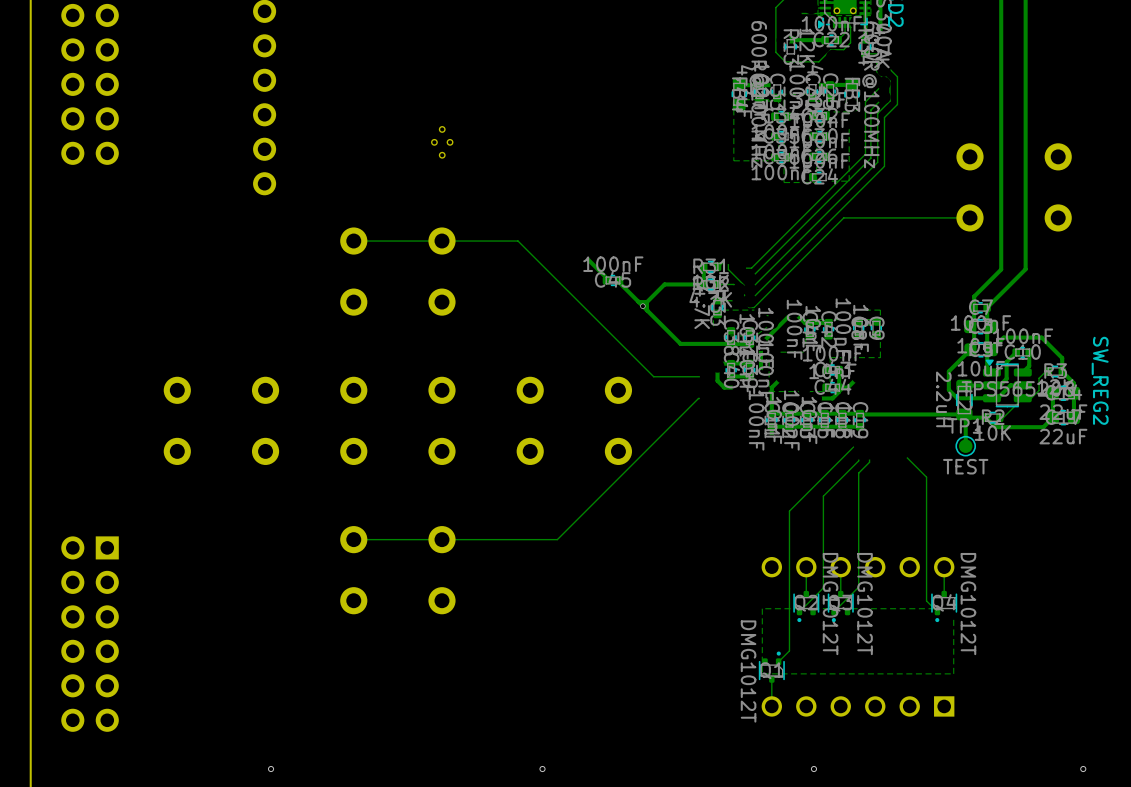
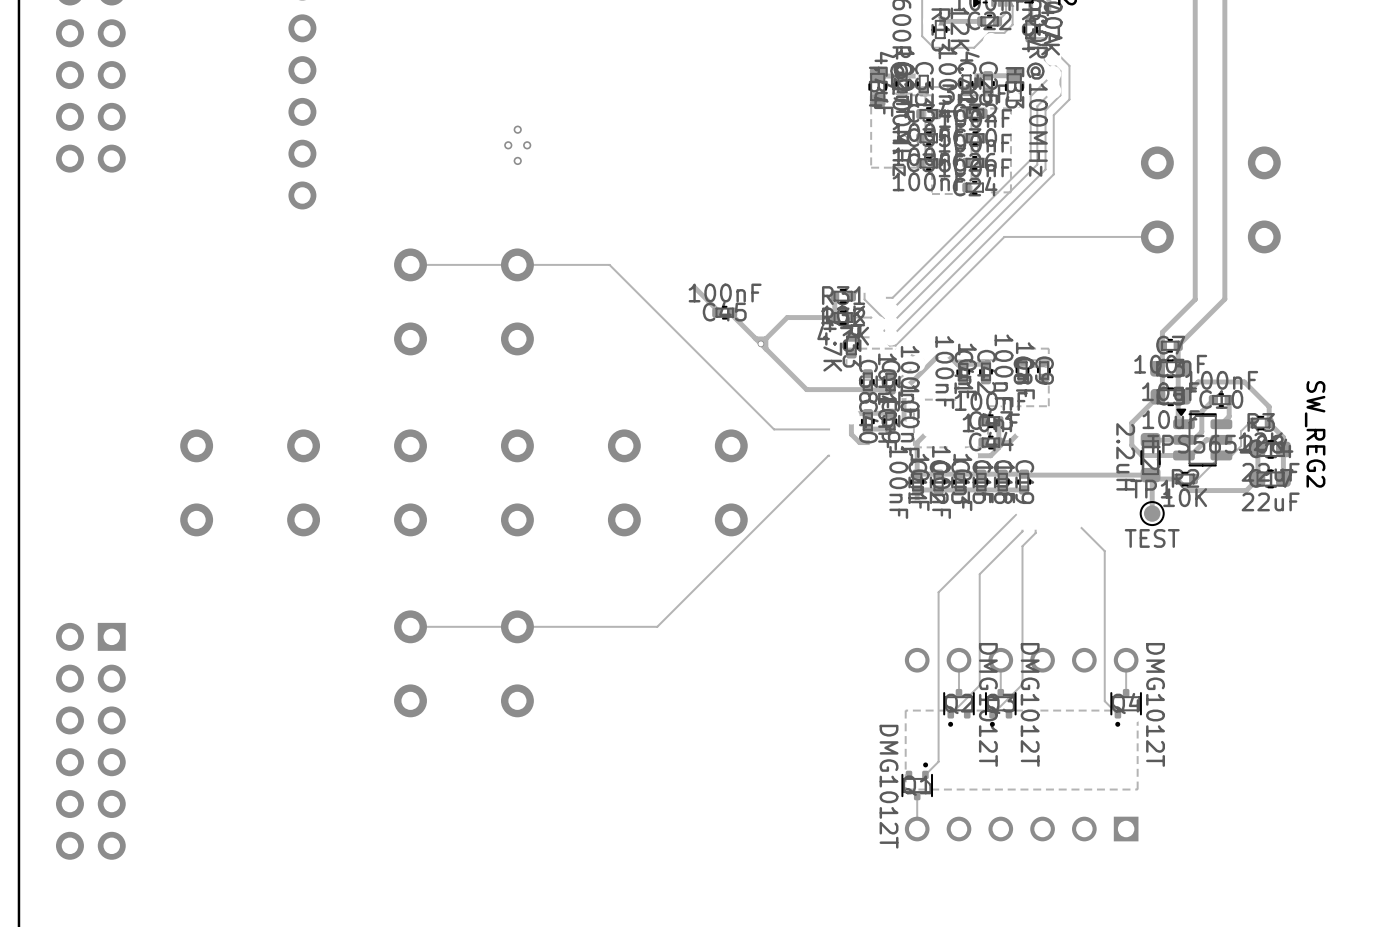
via: (271, 769) -> none
via: (542, 769) -> none
via: (813, 769) -> none
via: (1083, 769) -> none

